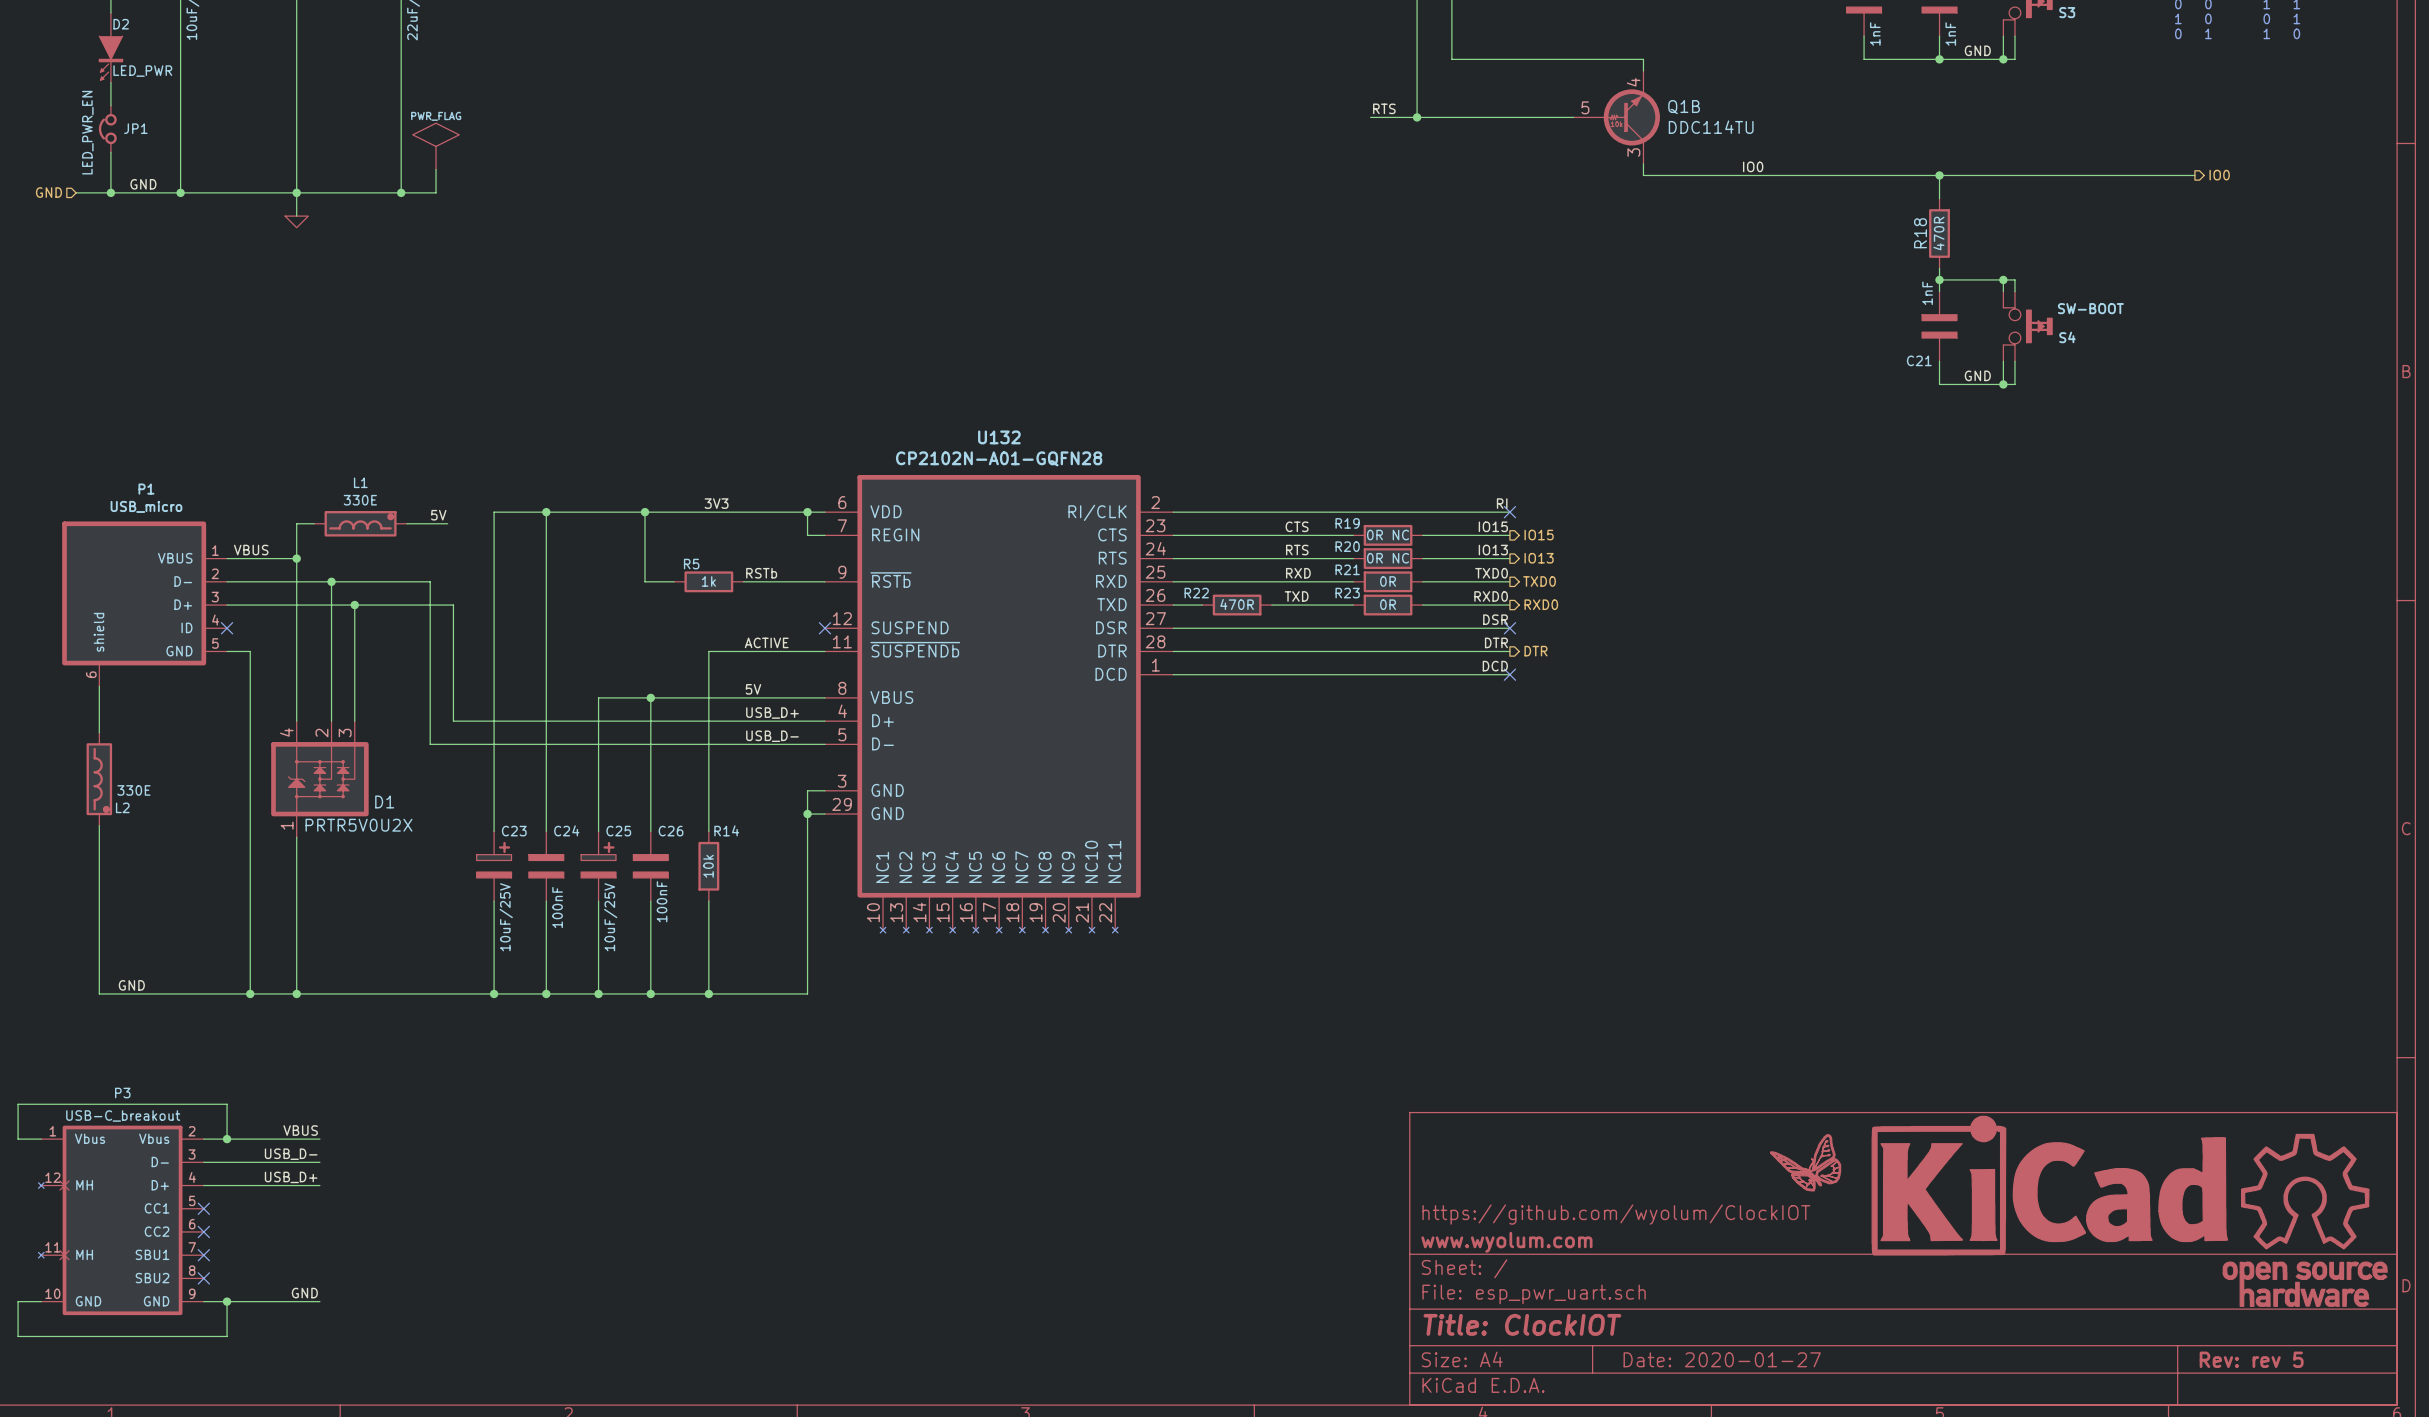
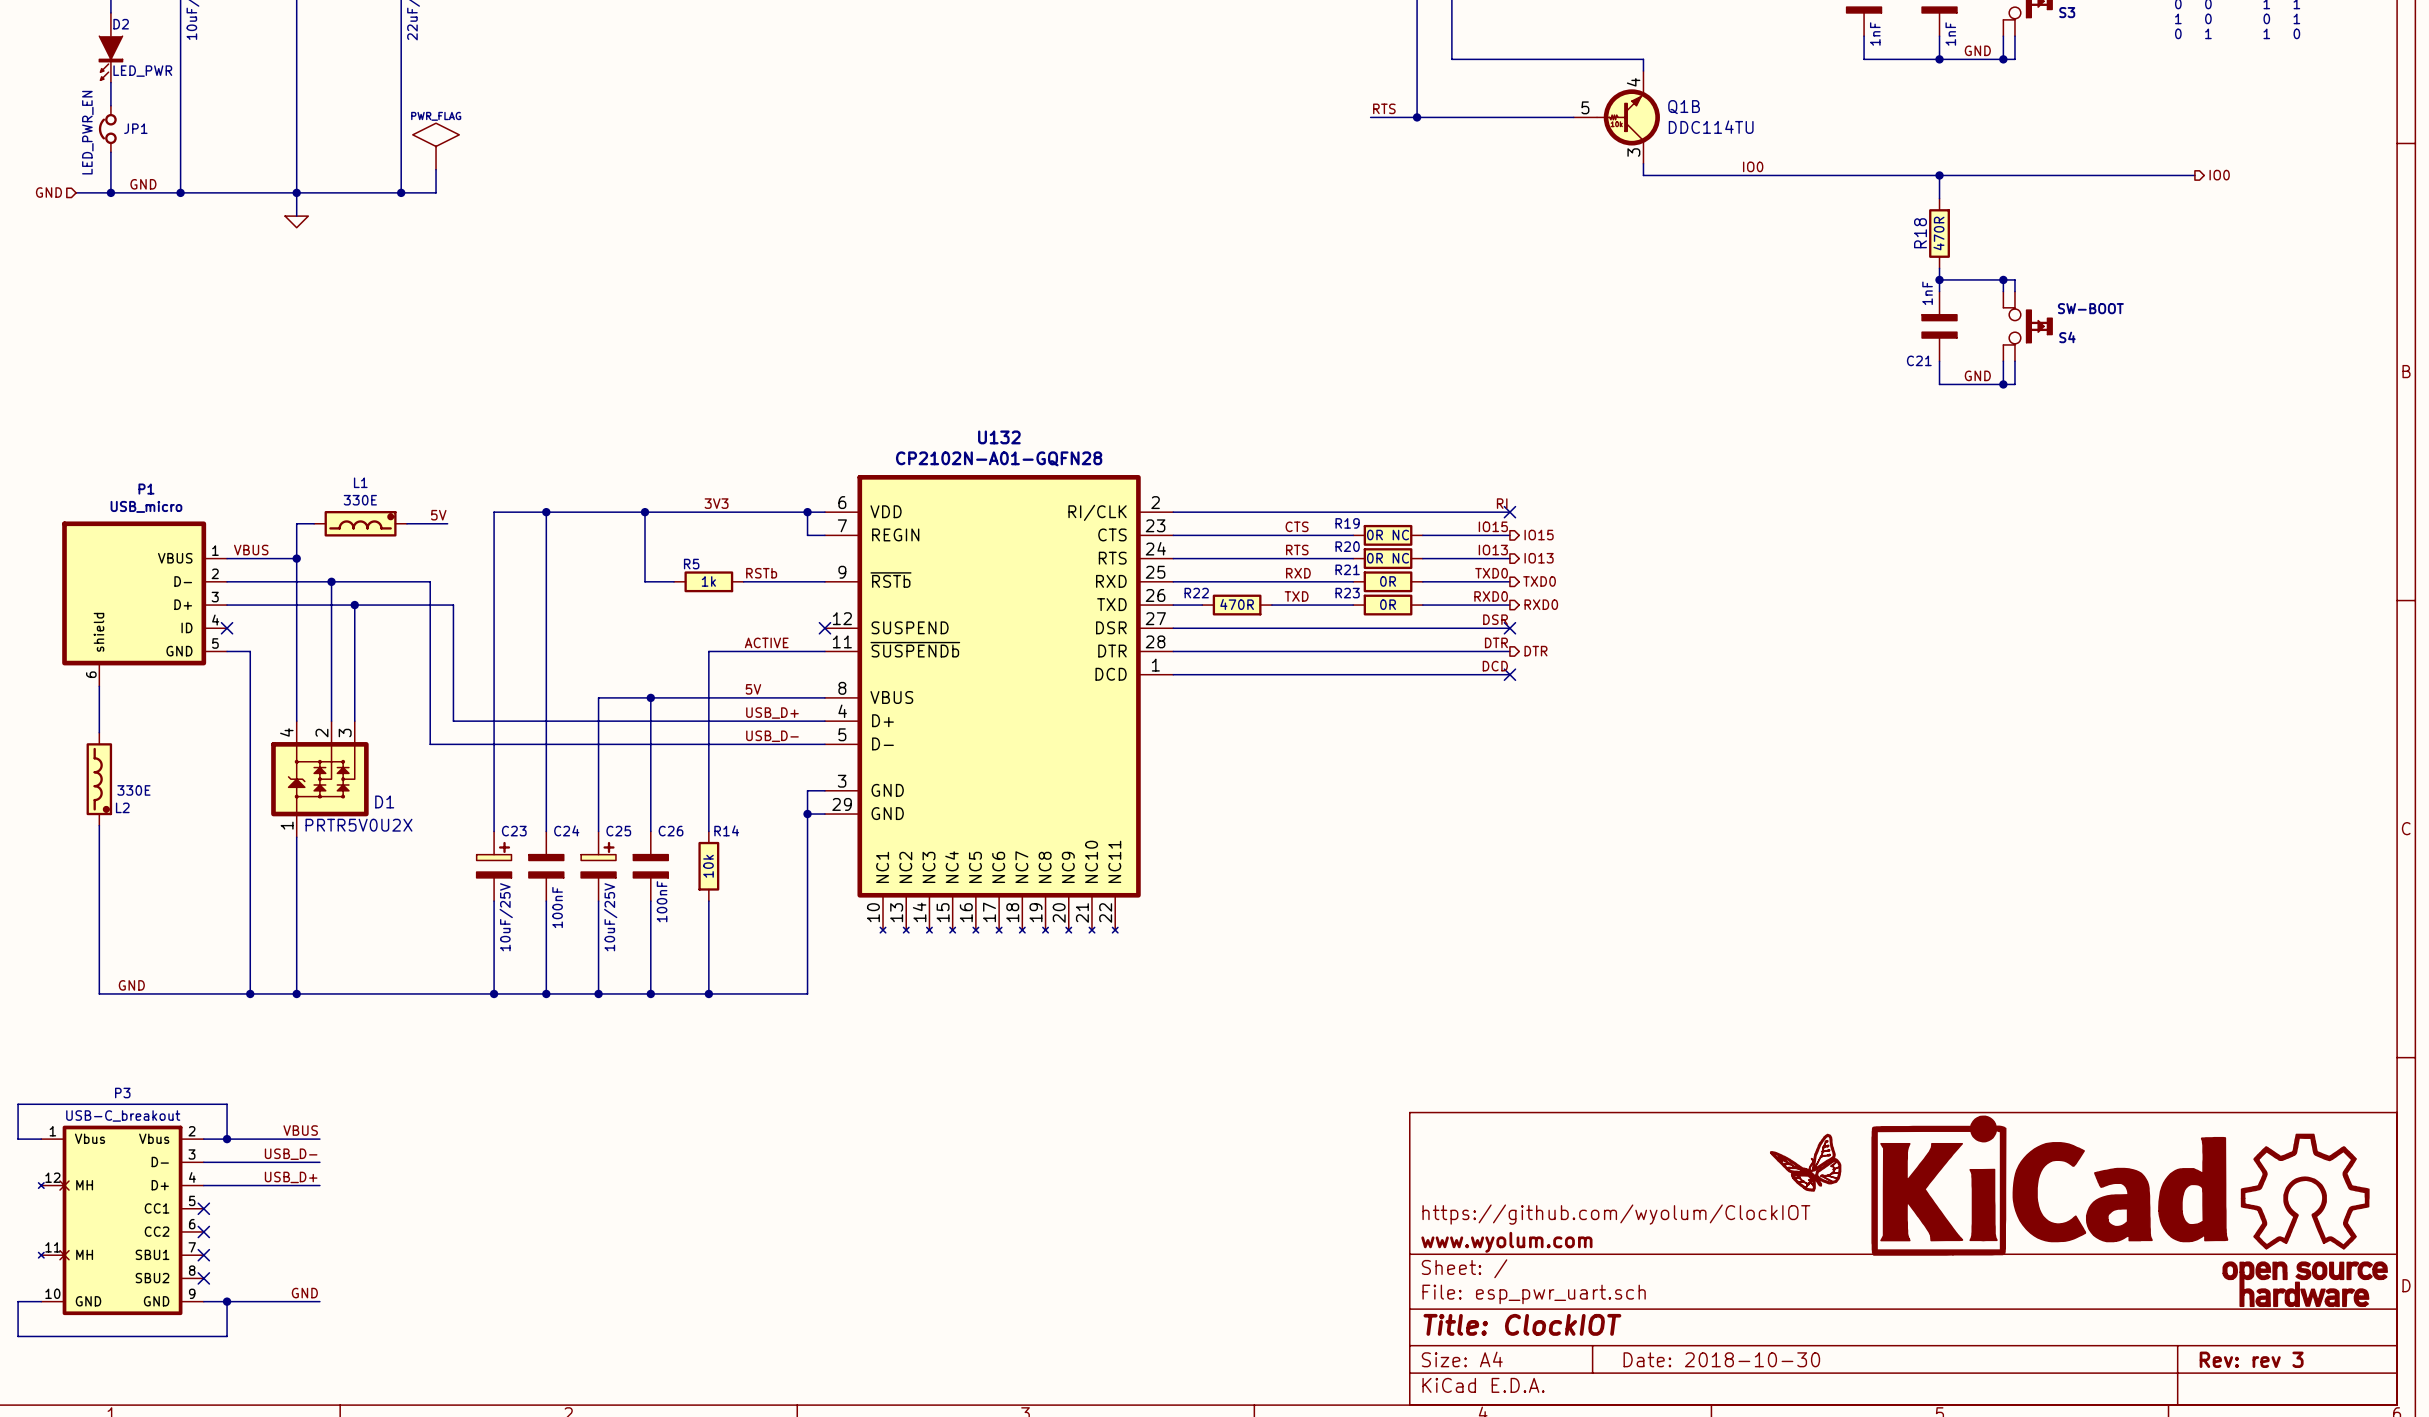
title block: Date: 2020-01-27 (1722, 1359) -> Date: 2018-10-30 (1721, 1359)
title block: Rev: rev 5 (2251, 1359) -> Rev: rev 3 (2251, 1359)

